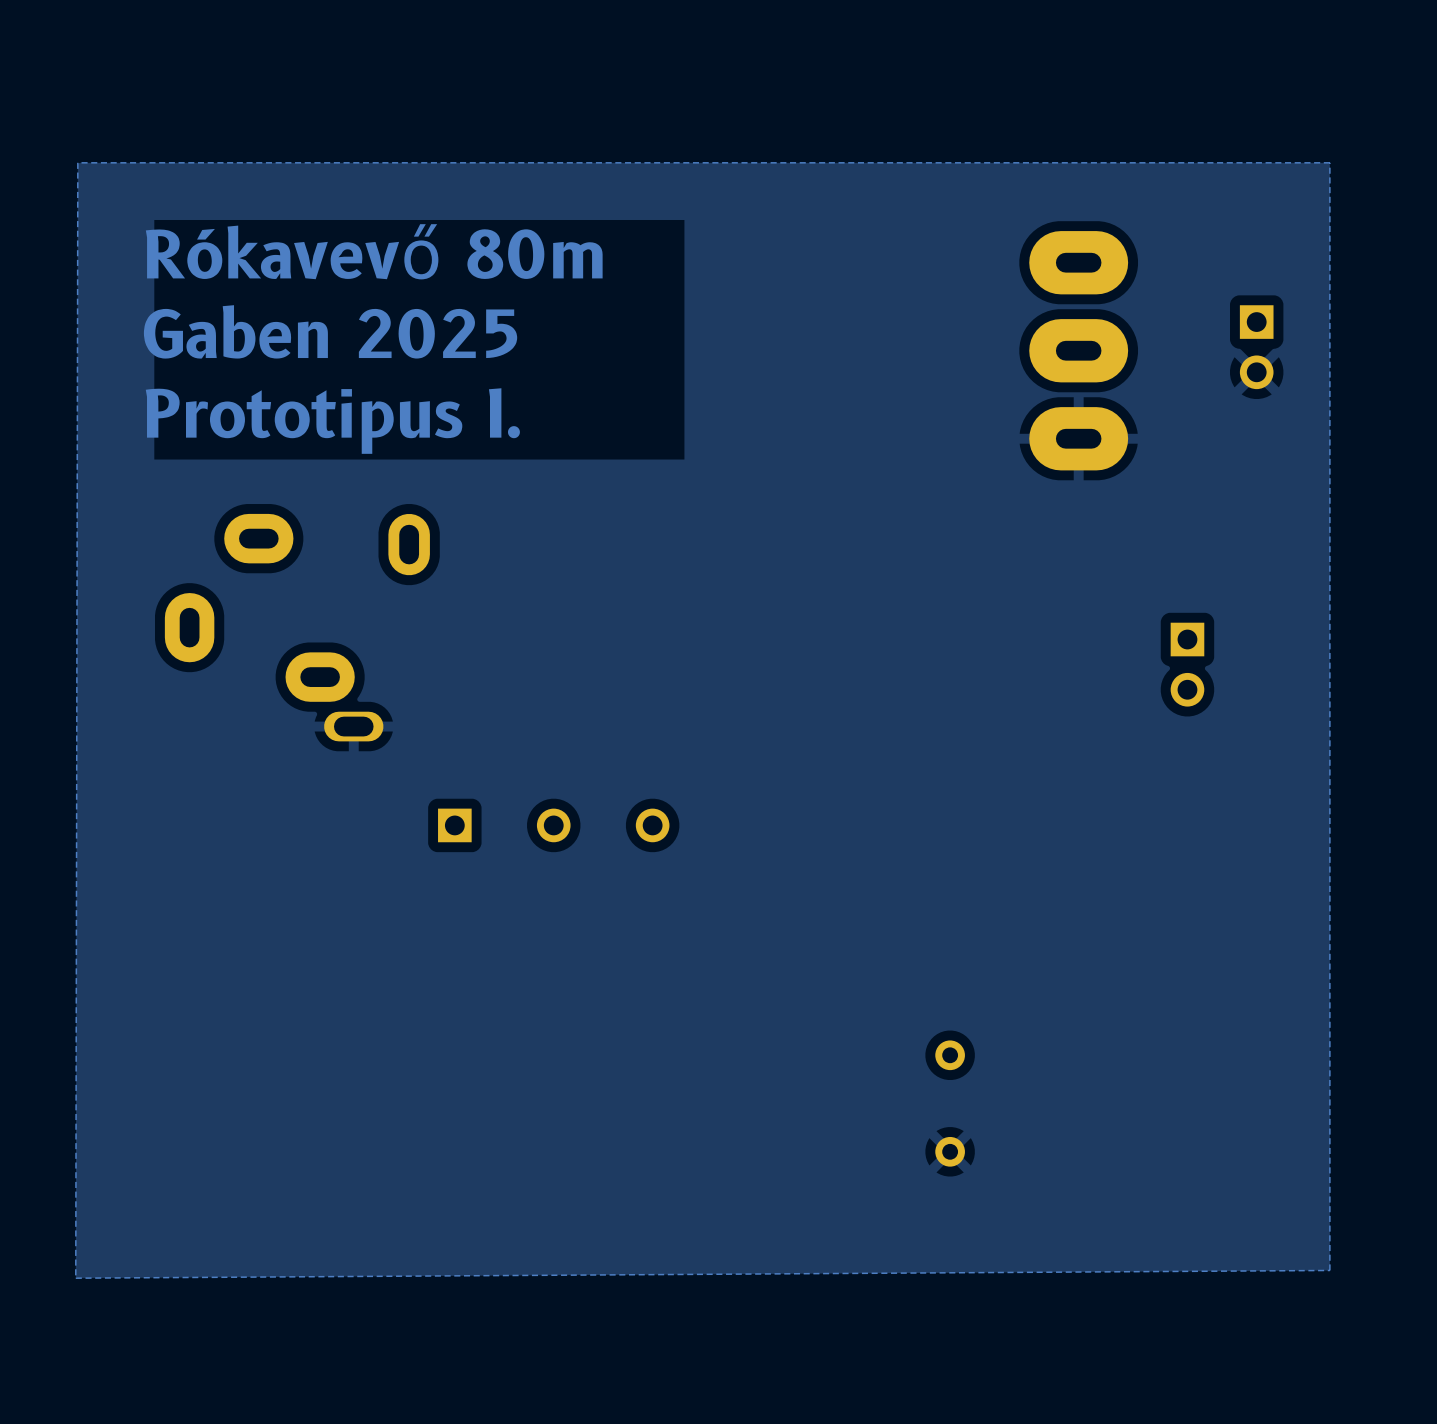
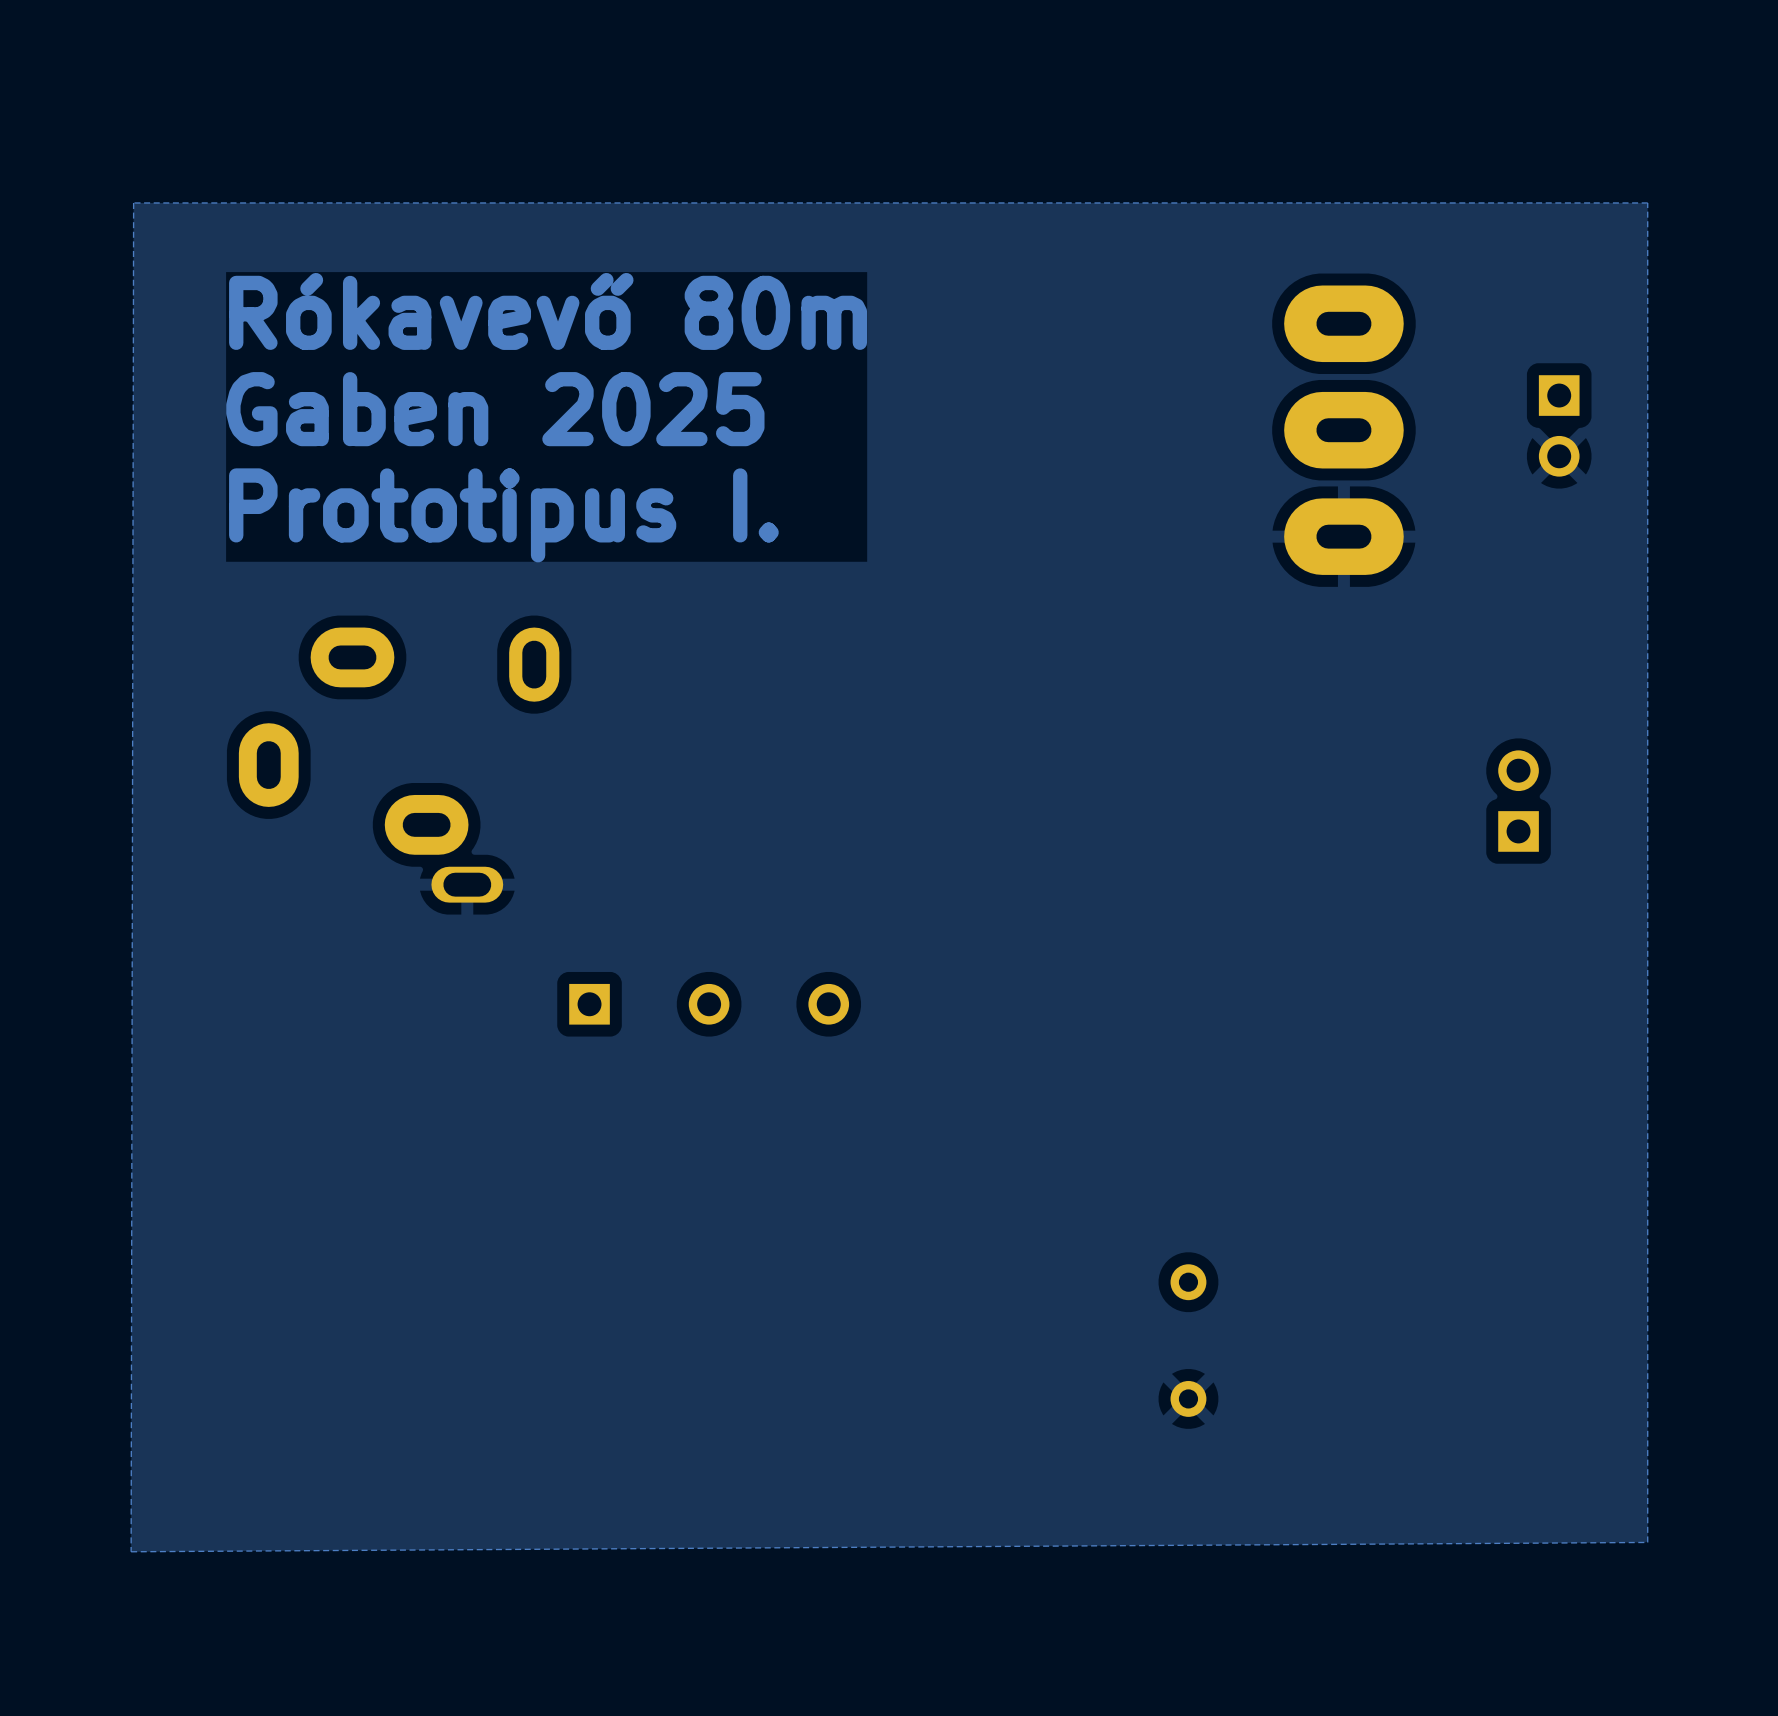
part rotation: 0° (1187, 664) -> 180° (1518, 801)

